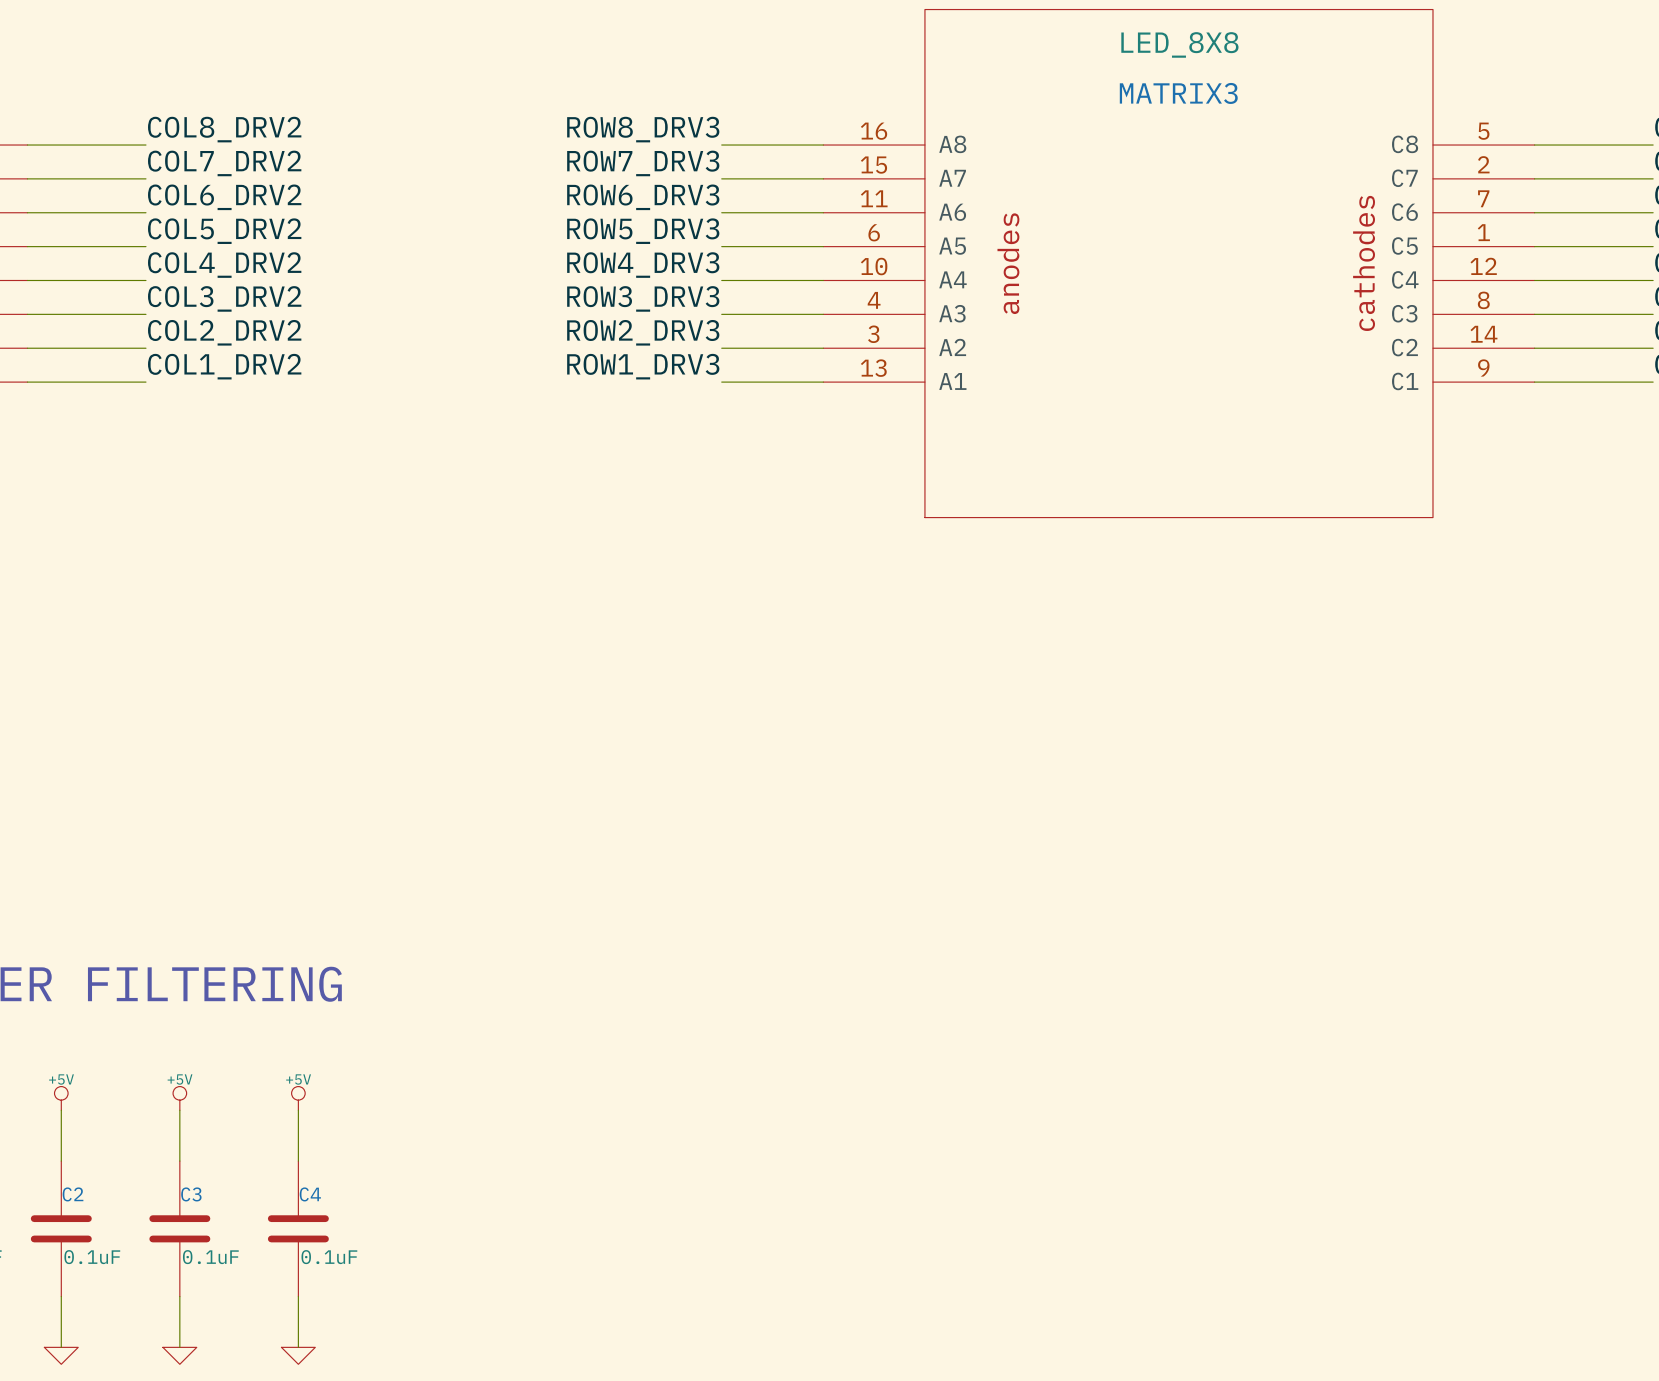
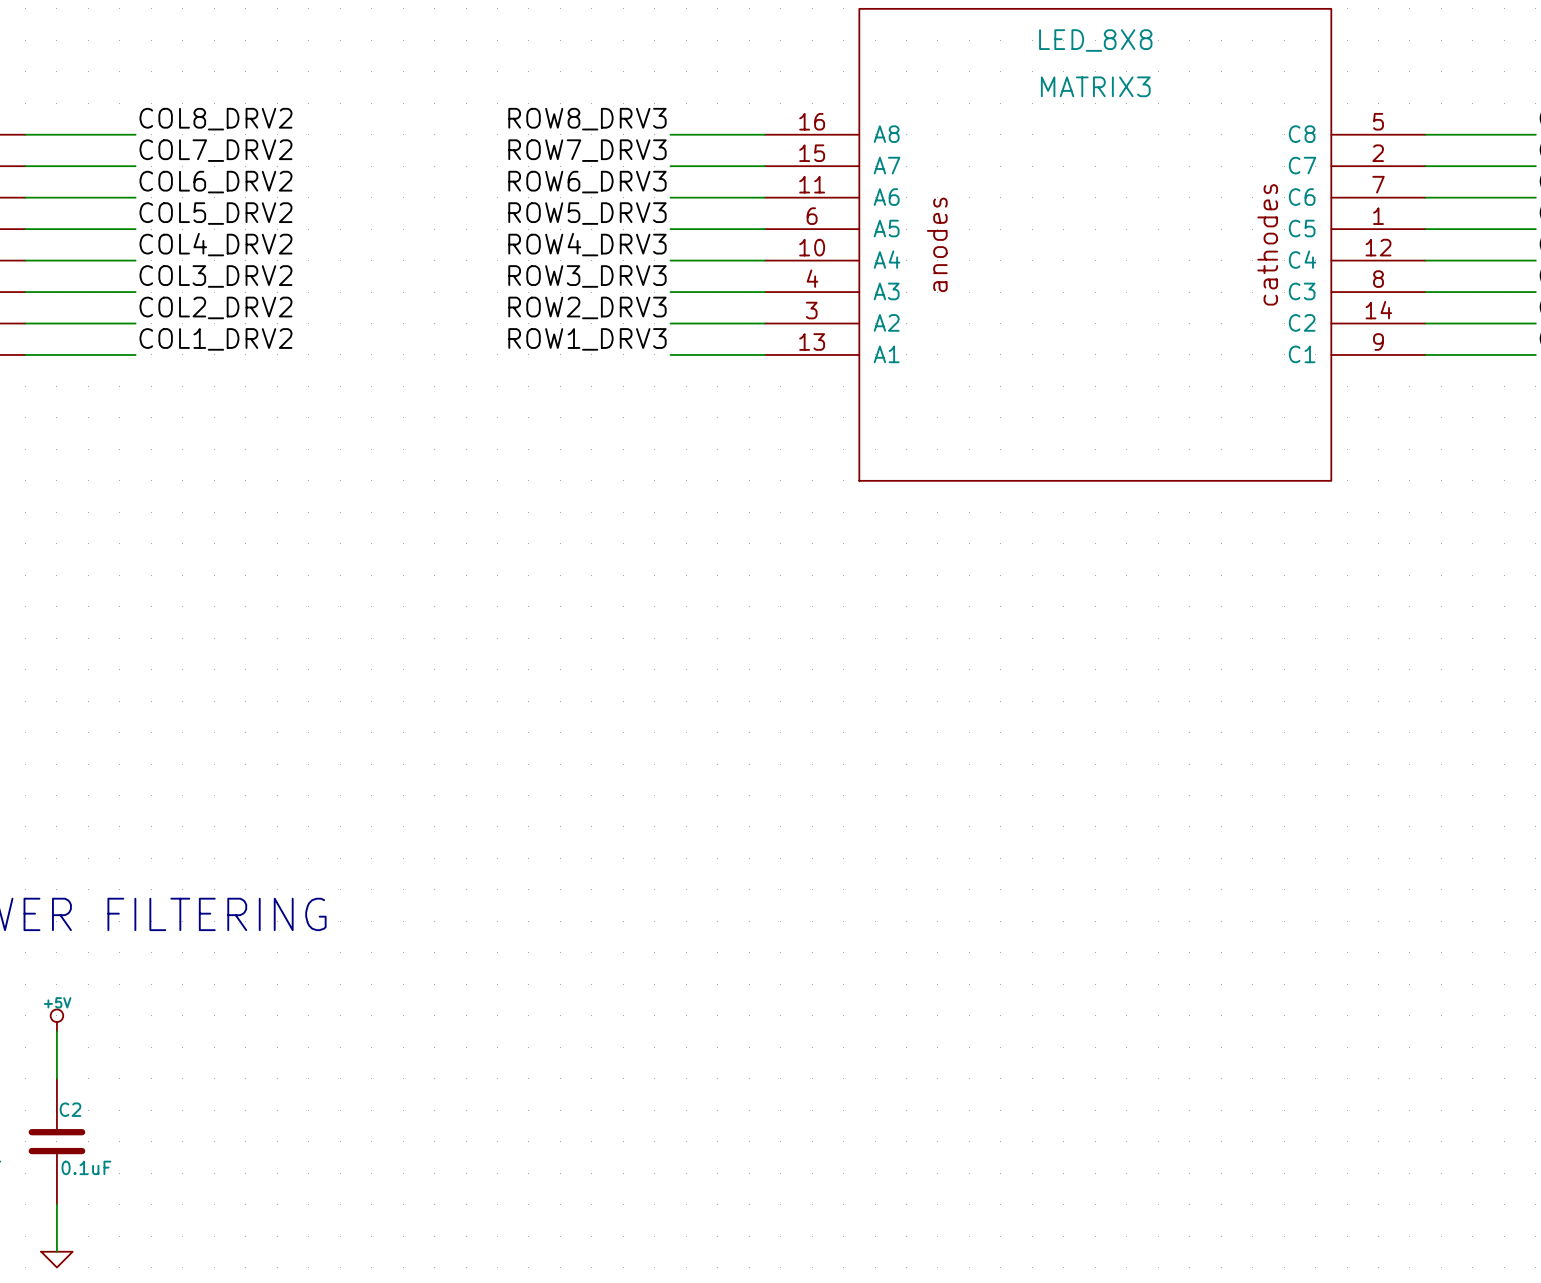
power symbol: +5V (179, 1098) -> none
power symbol: +5V (298, 1098) -> none
wire: (179, 1110) (179, 1161) -> none
wire: (298, 1110) (298, 1161) -> none
C3: 0.1uF (179, 1228) -> none
C4: 0.1uF (298, 1228) -> none
wire: (179, 1296) (179, 1347) -> none
wire: (298, 1296) (298, 1347) -> none
power symbol: (179, 1355) -> none
power symbol: (298, 1355) -> none

